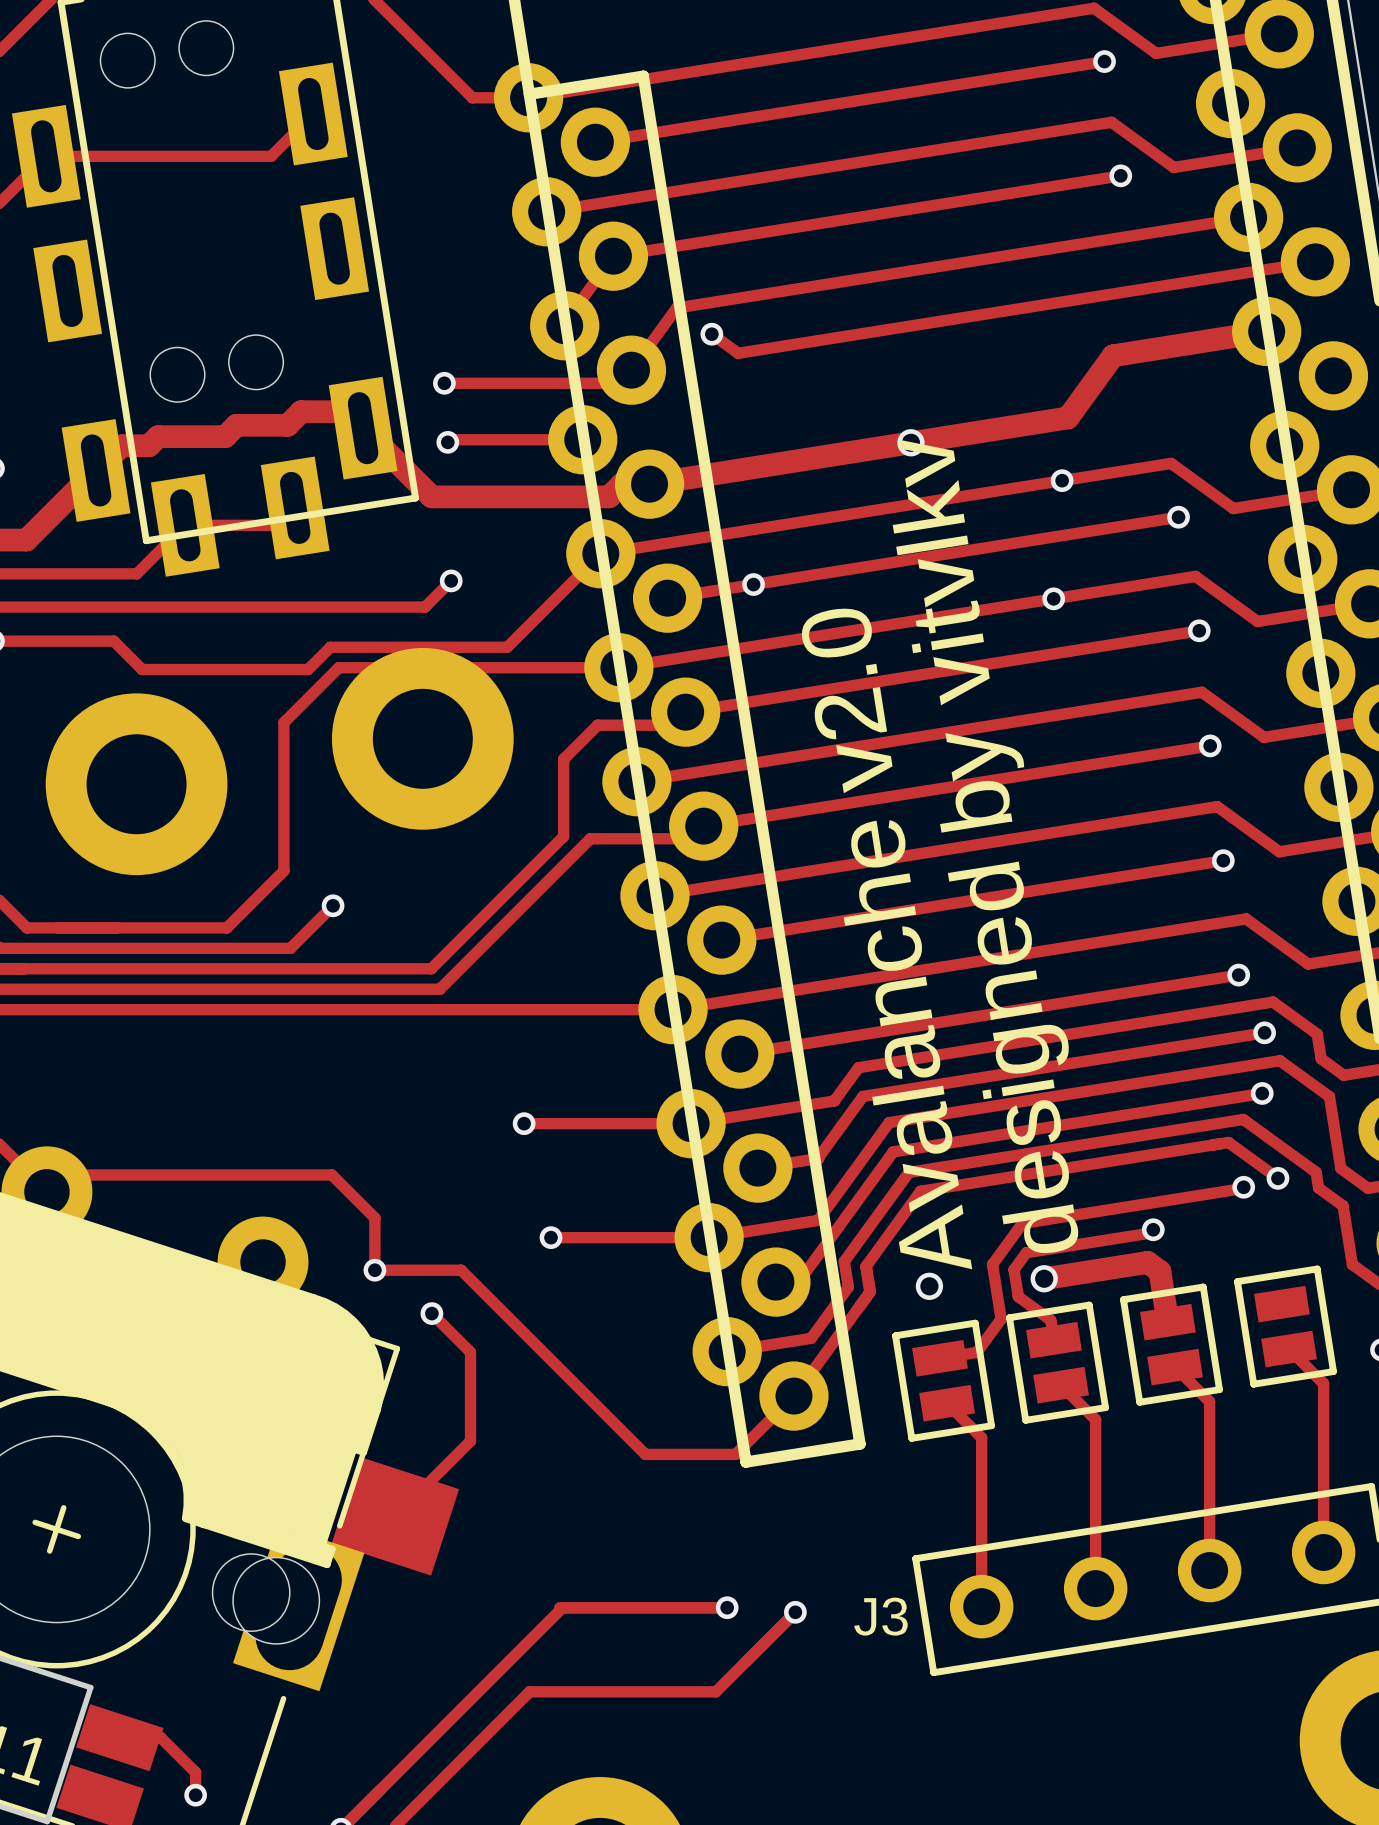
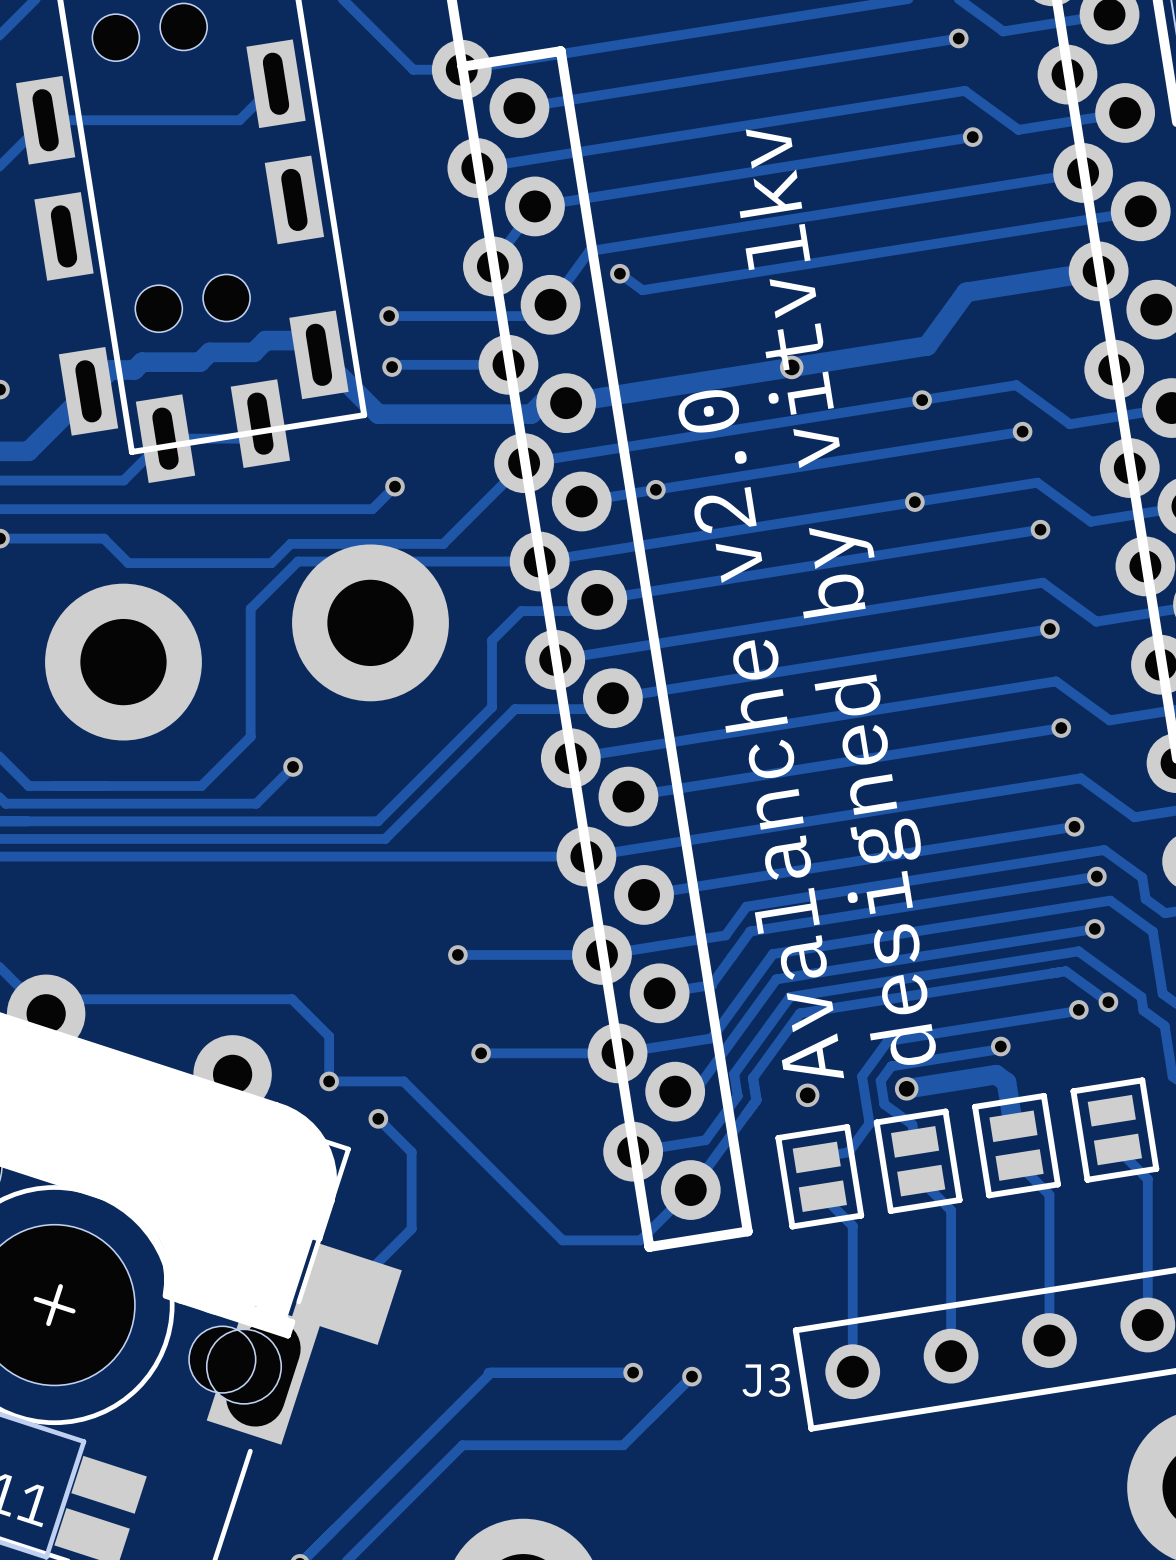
track: (119, 1737) (160, 1737) (195, 1772) (195, 1795) -> none
via: (195, 1795) -> none

